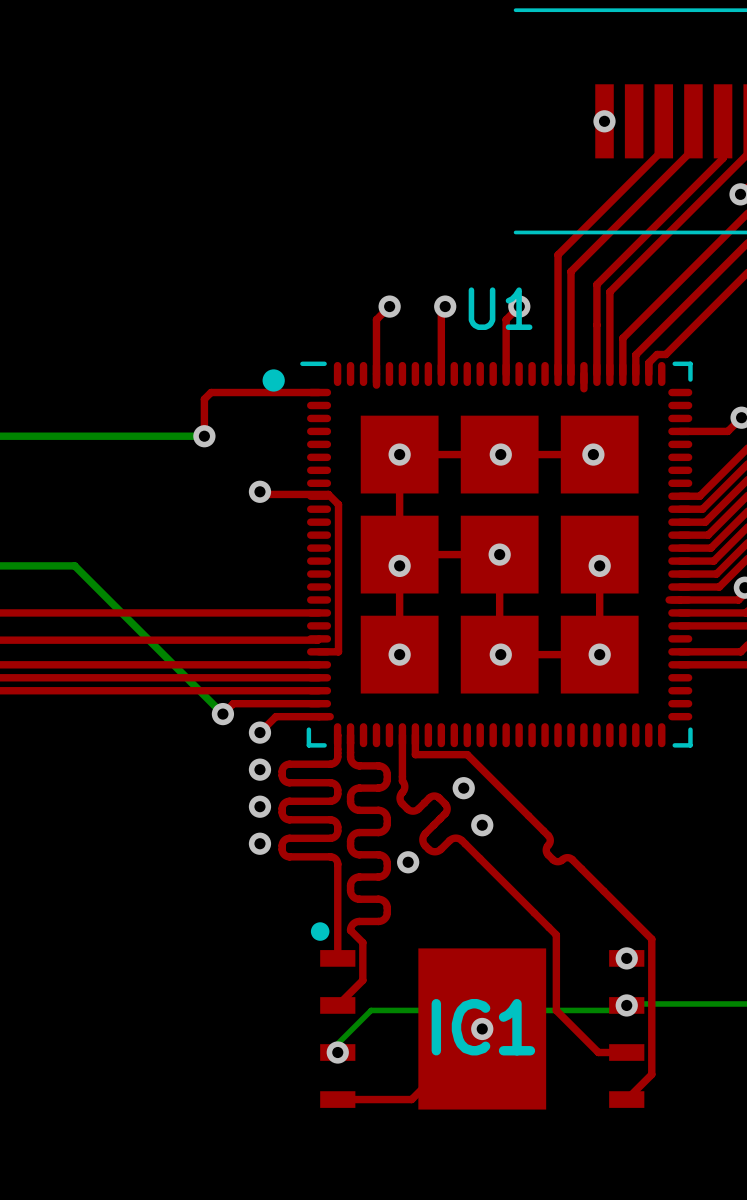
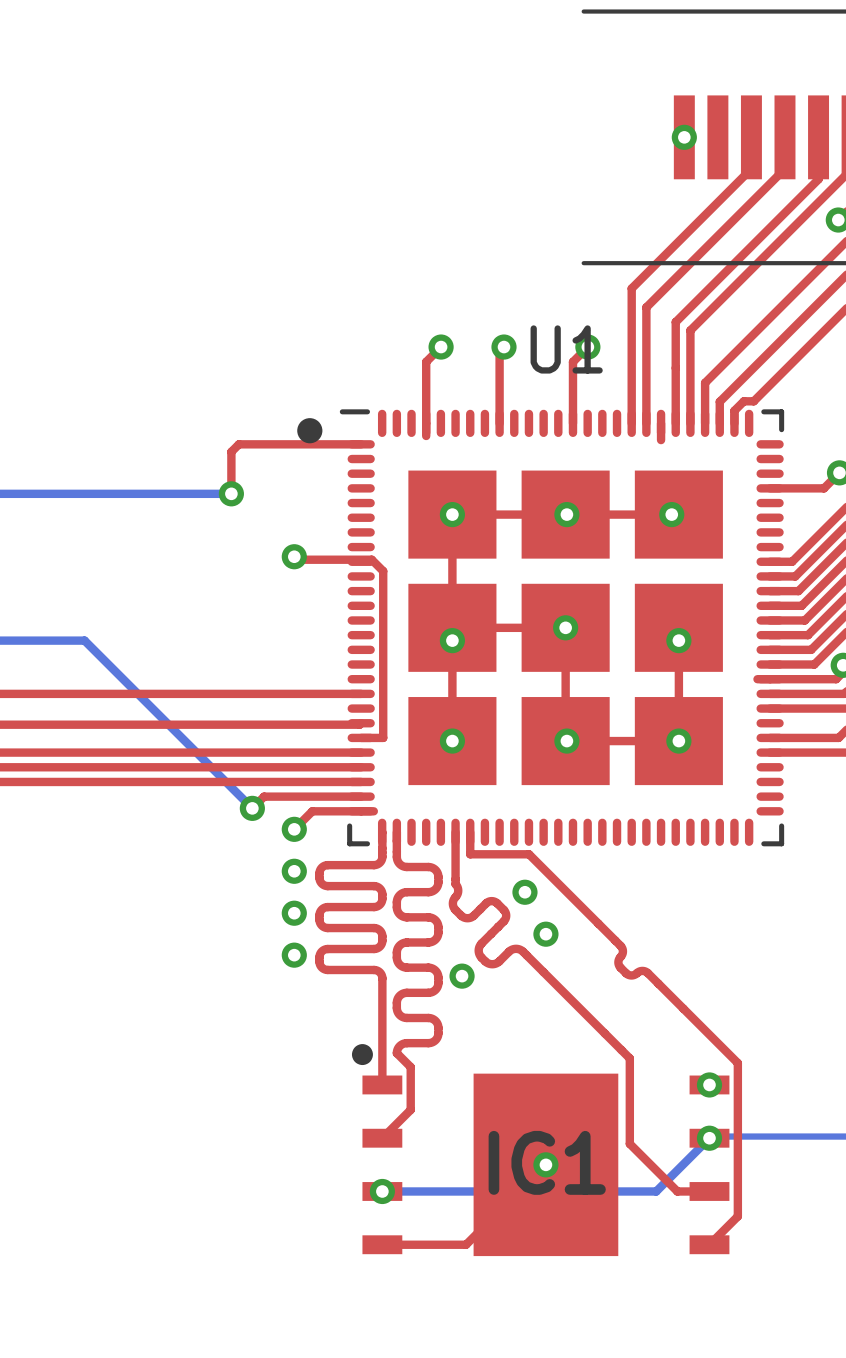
bottom track: (630, 1010) (371, 1010) (334, 1047) (337, 1052) -> (721, 1136) (711, 1136) (656, 1191) (382, 1191)

